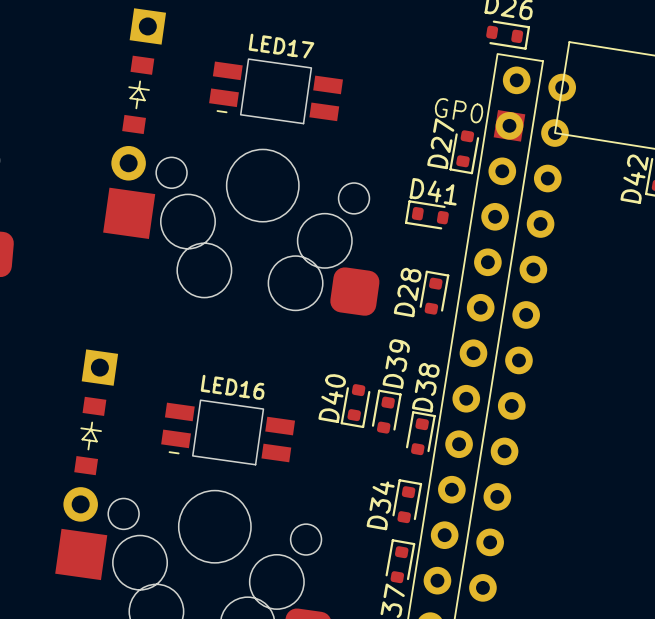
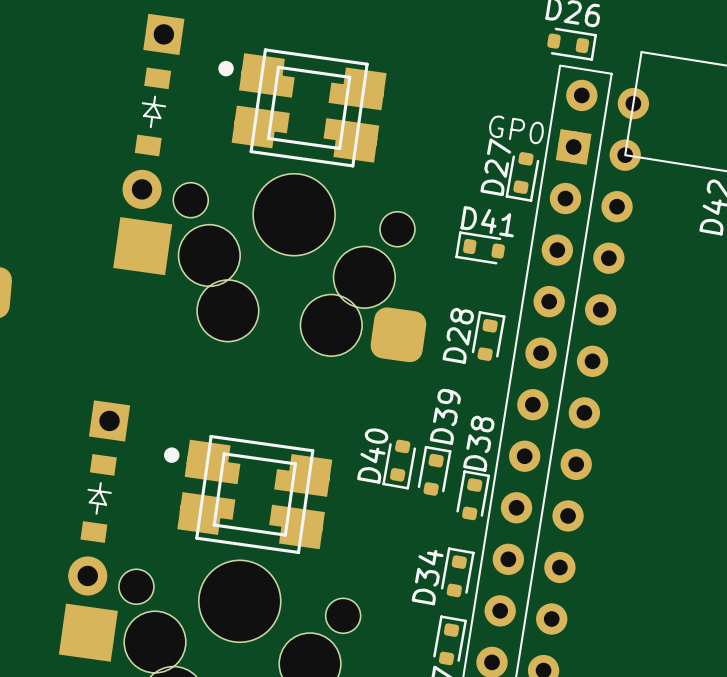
part: none -> (302, 107)
LED17: (276, 91) -> none
part: none -> (248, 494)
LED16: (228, 432) -> none

